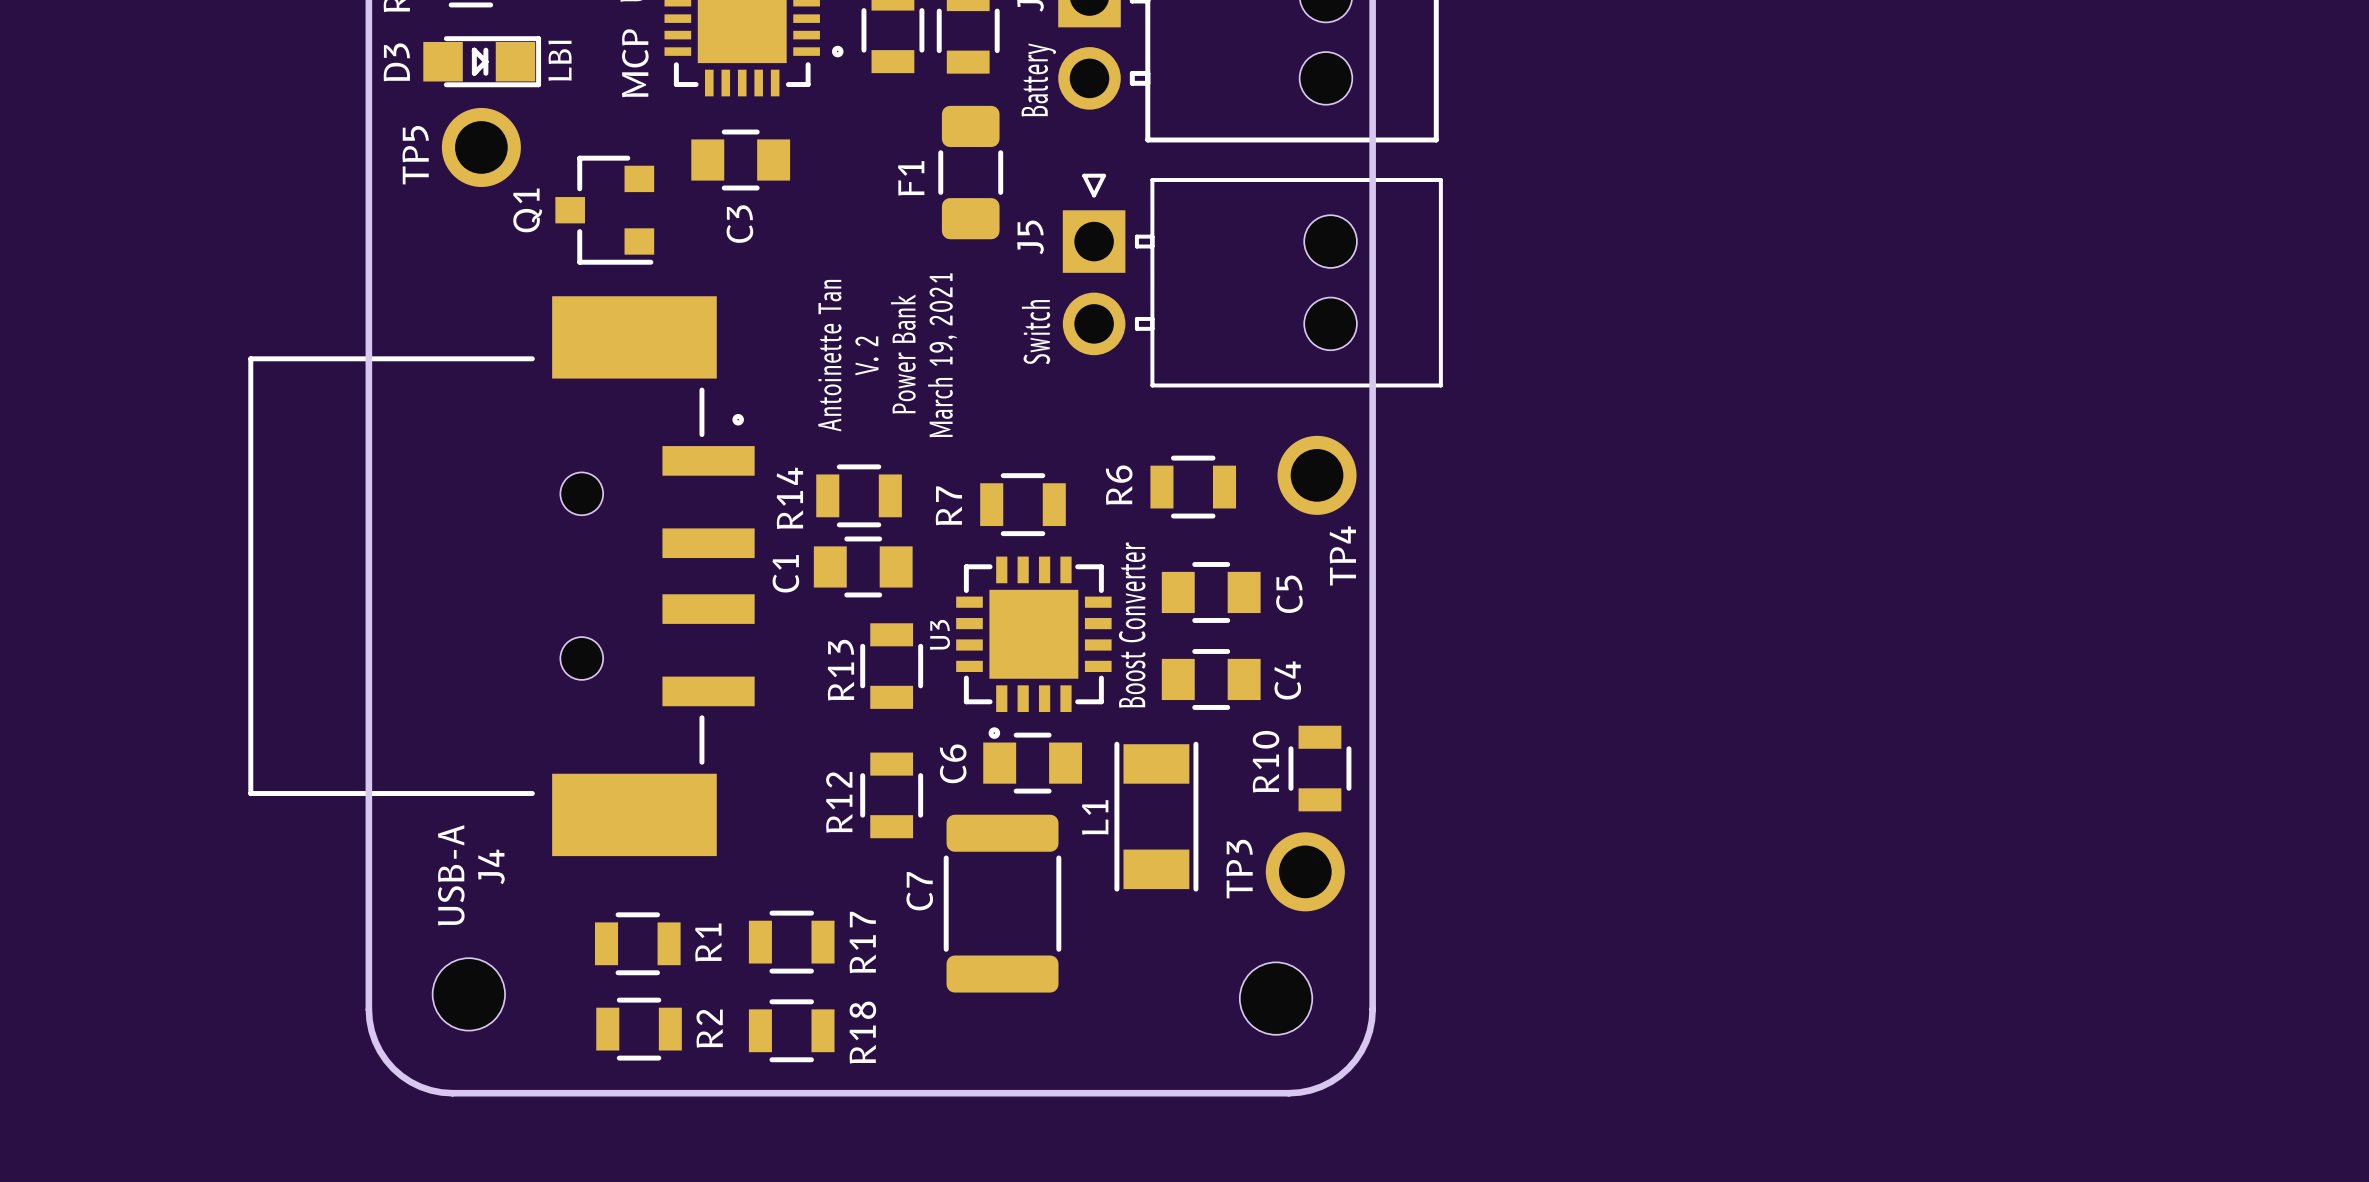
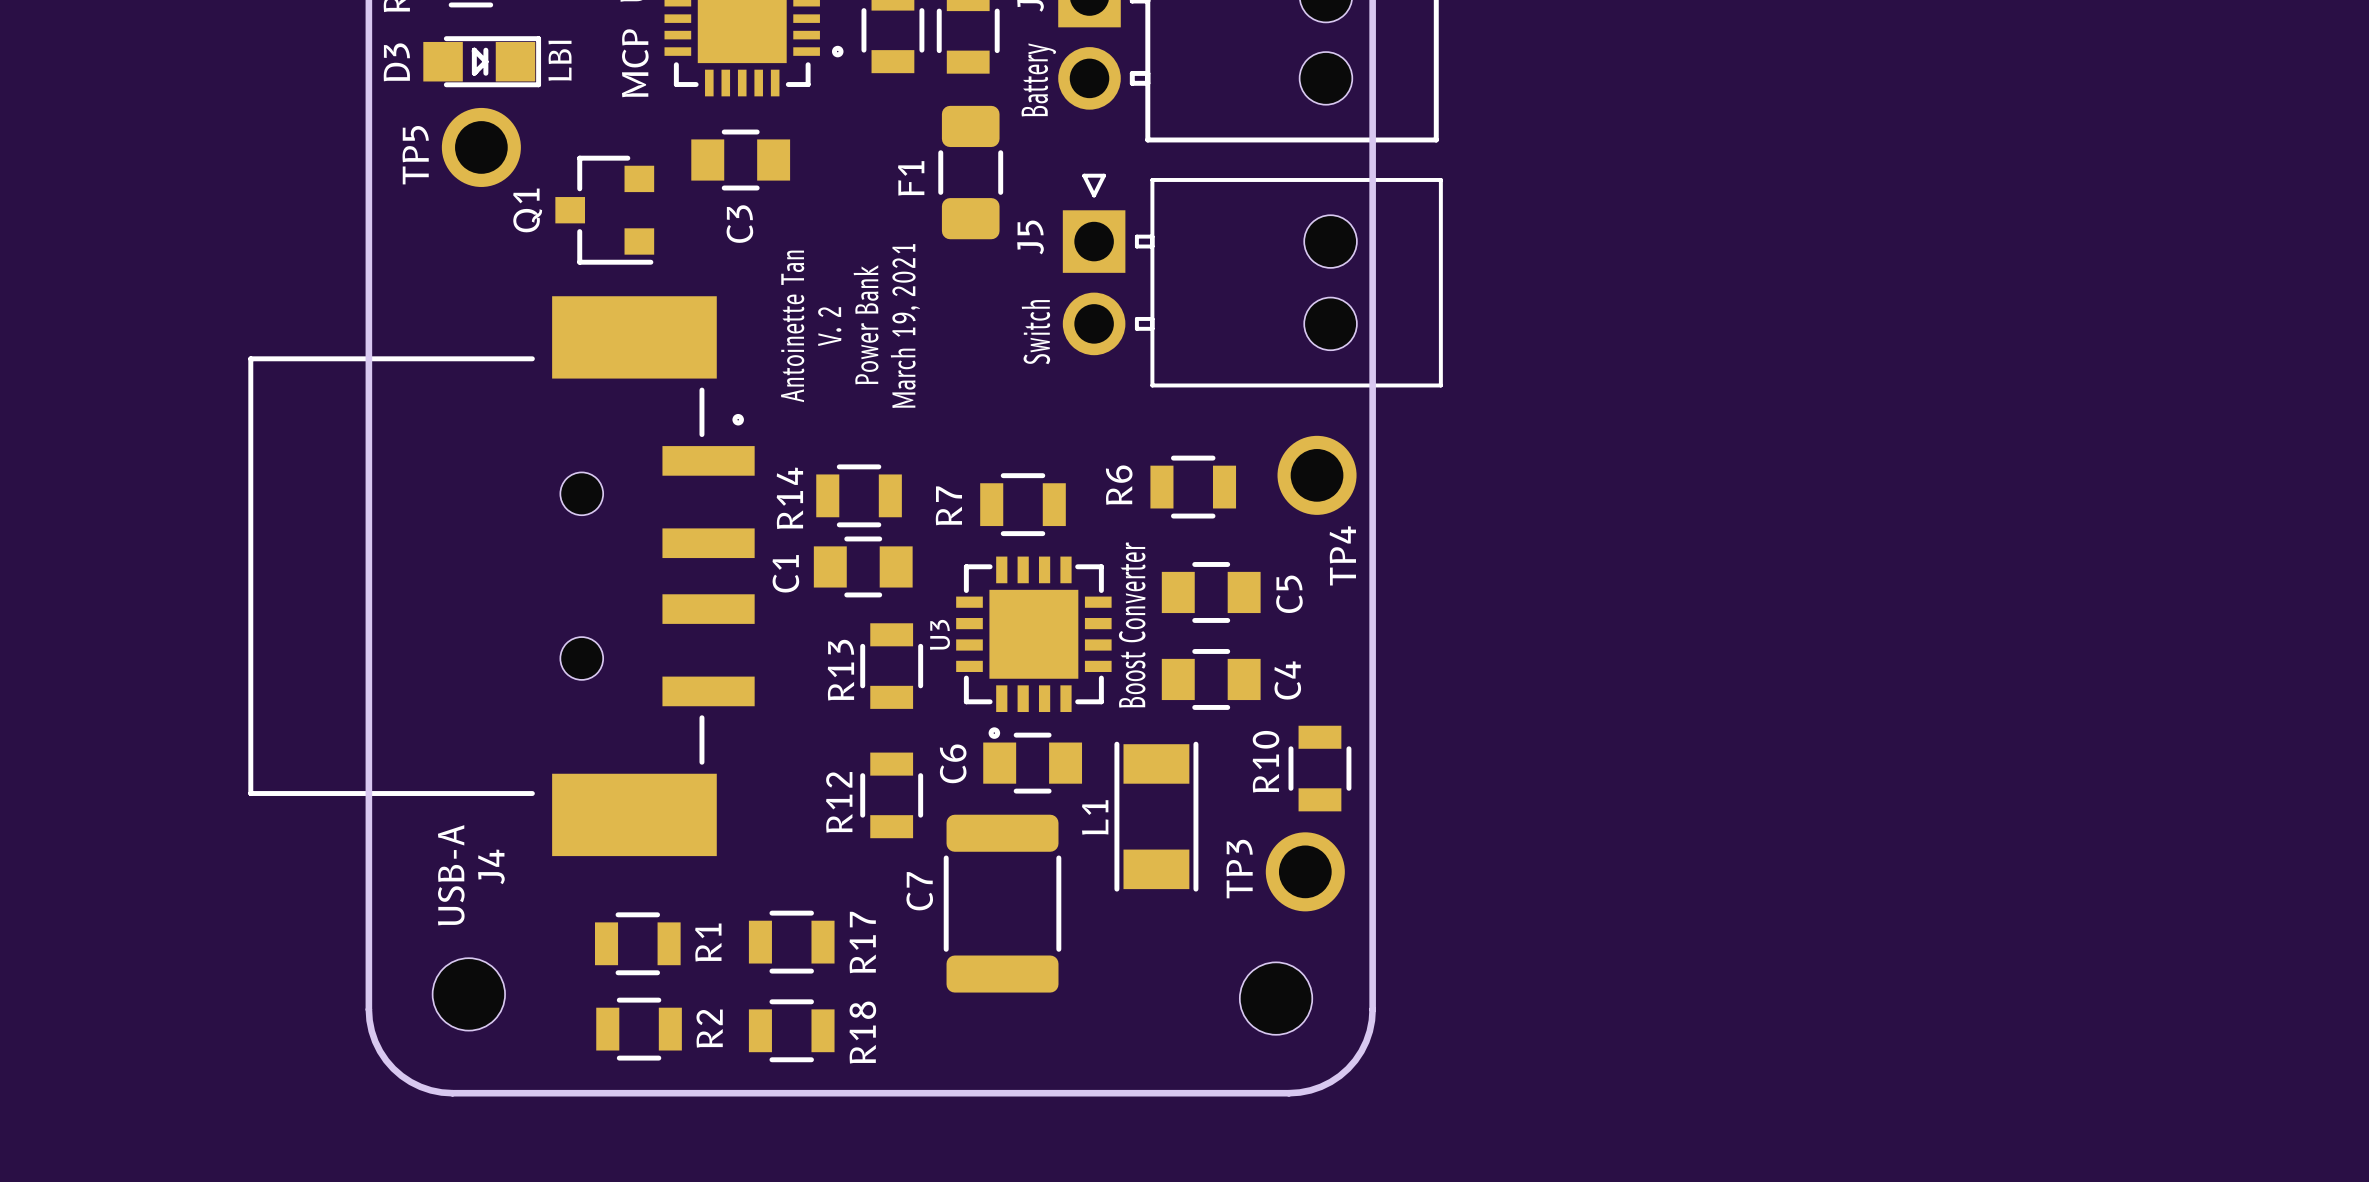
text position: Power Bank (903, 354) -> Power Bank (866, 324)
text position: Antoinette Tan (829, 355) -> Antoinette Tan (792, 326)
text position: V. 2 (866, 355) -> V. 2 (829, 326)
text position: March 19, 2021 (942, 355) -> March 19, 2021 (905, 326)

